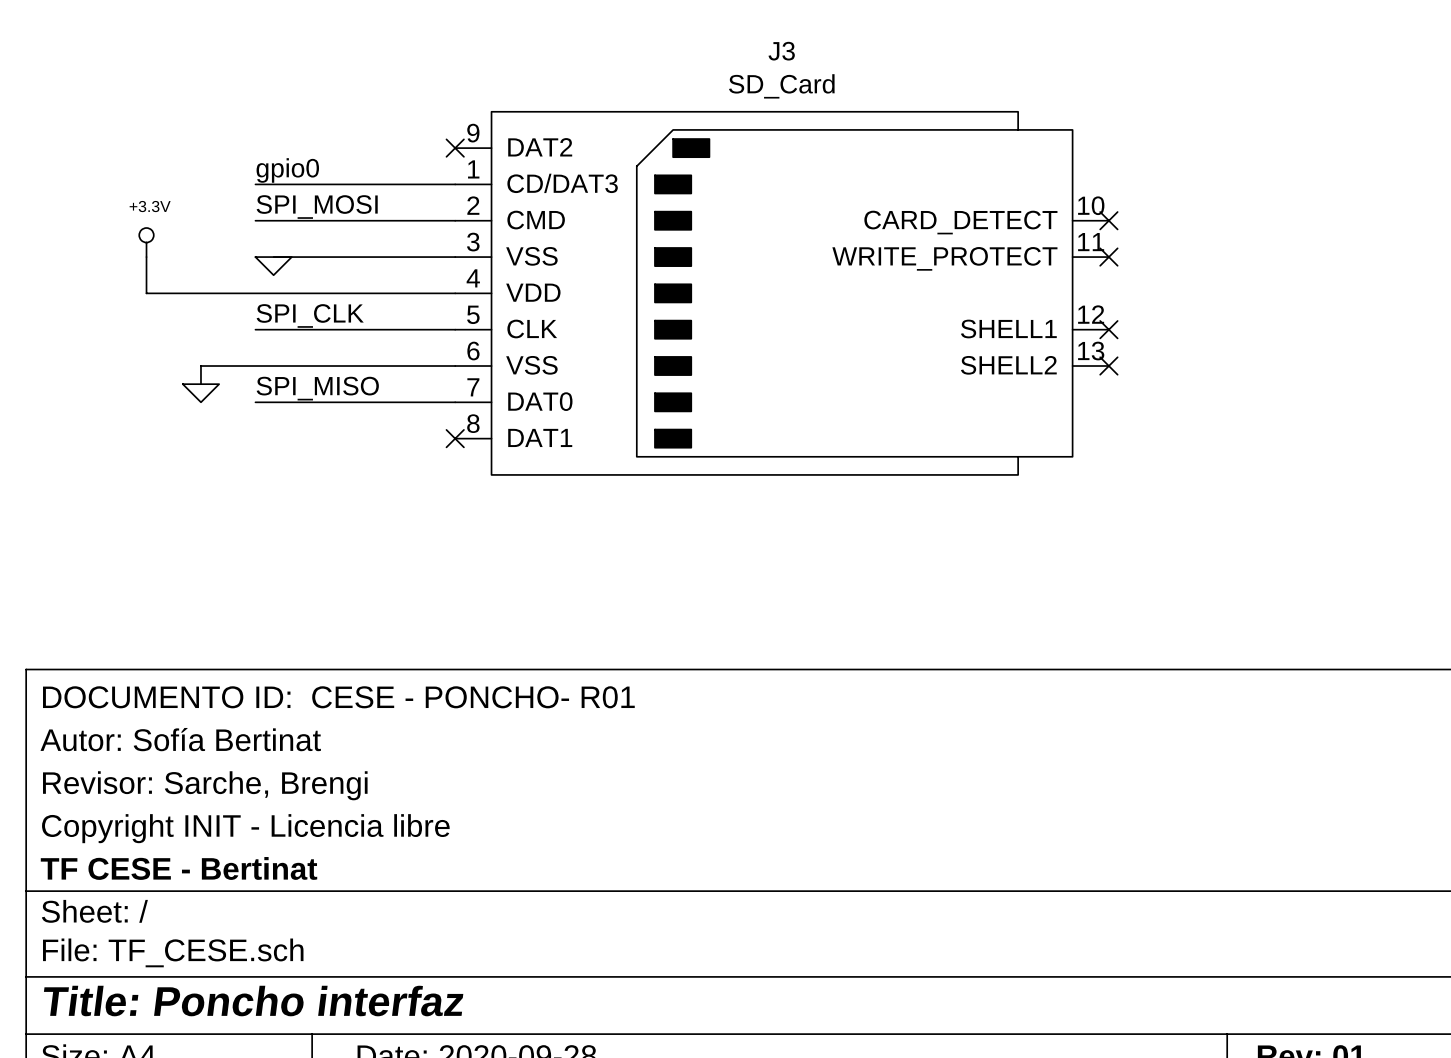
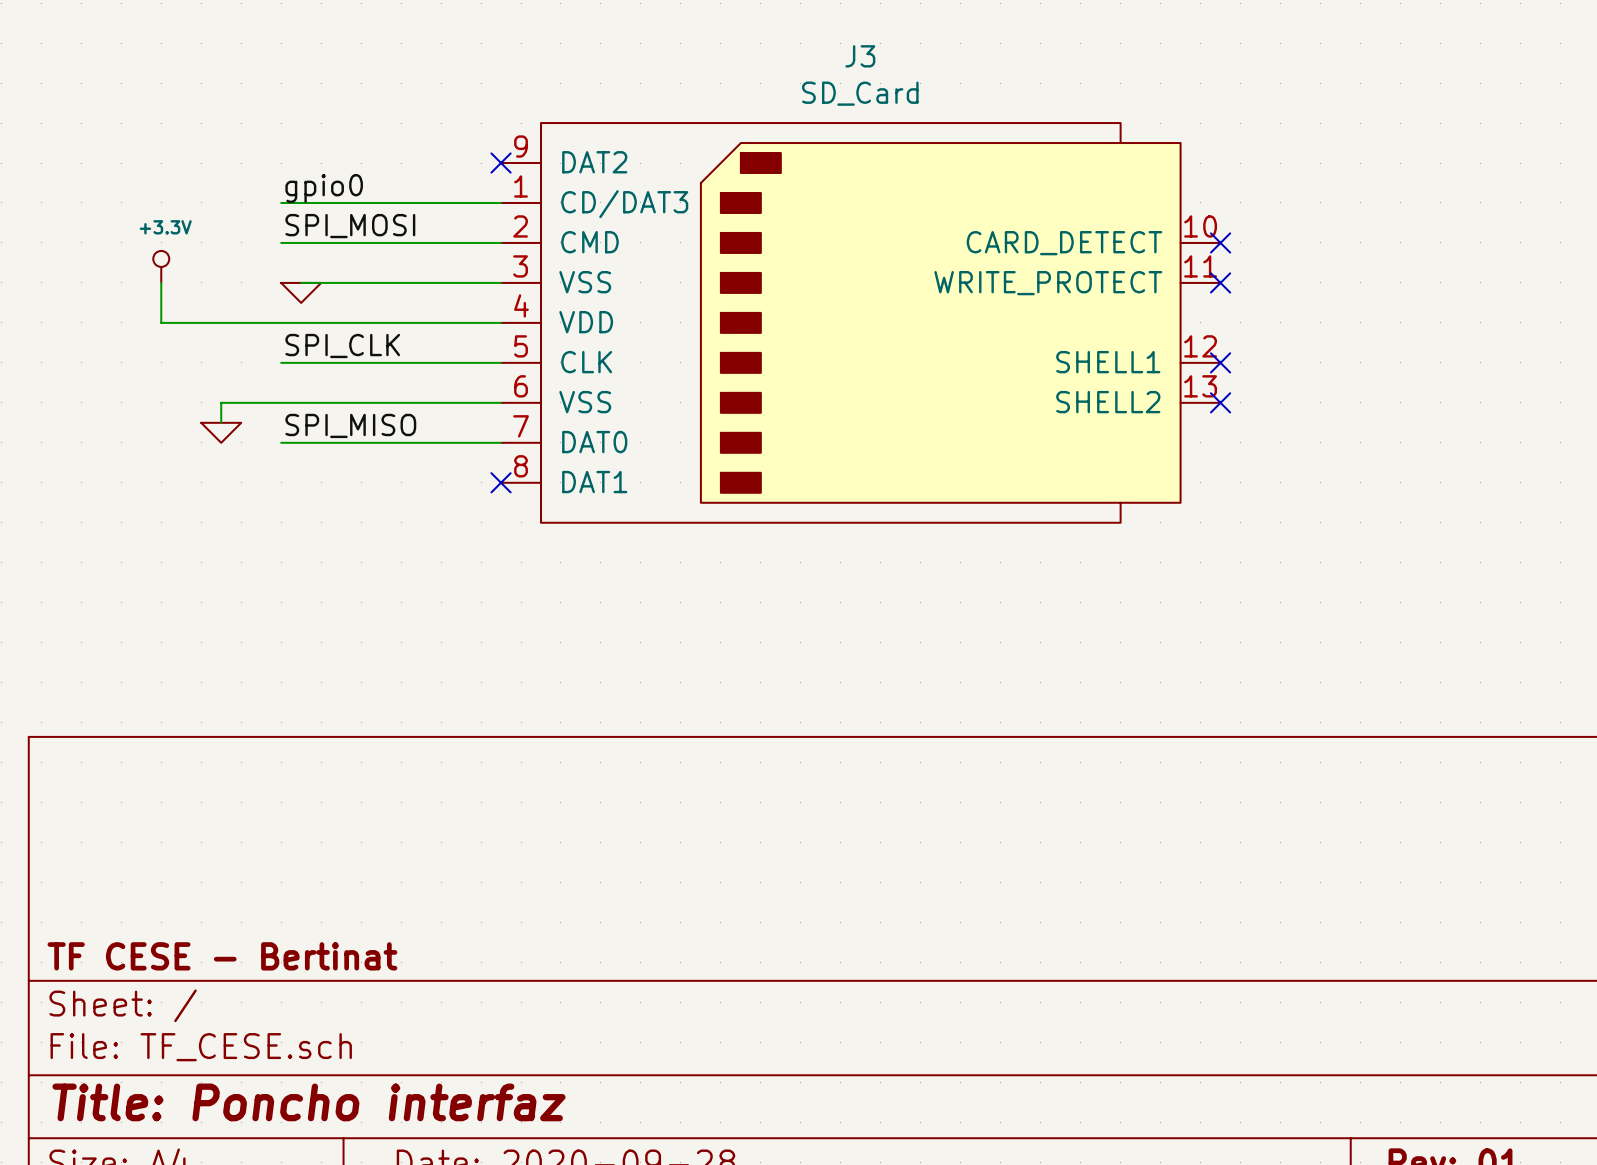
title block: DOCUMENTO ID: CESE - PONCHO- R01 (338, 697) -> none
title block: Autor: Sofía Bertinat (180, 739) -> none
title block: Revisor: Sarche, Brengi (205, 785) -> none
title block: Copyright INIT - Licencia libre (245, 828) -> none

